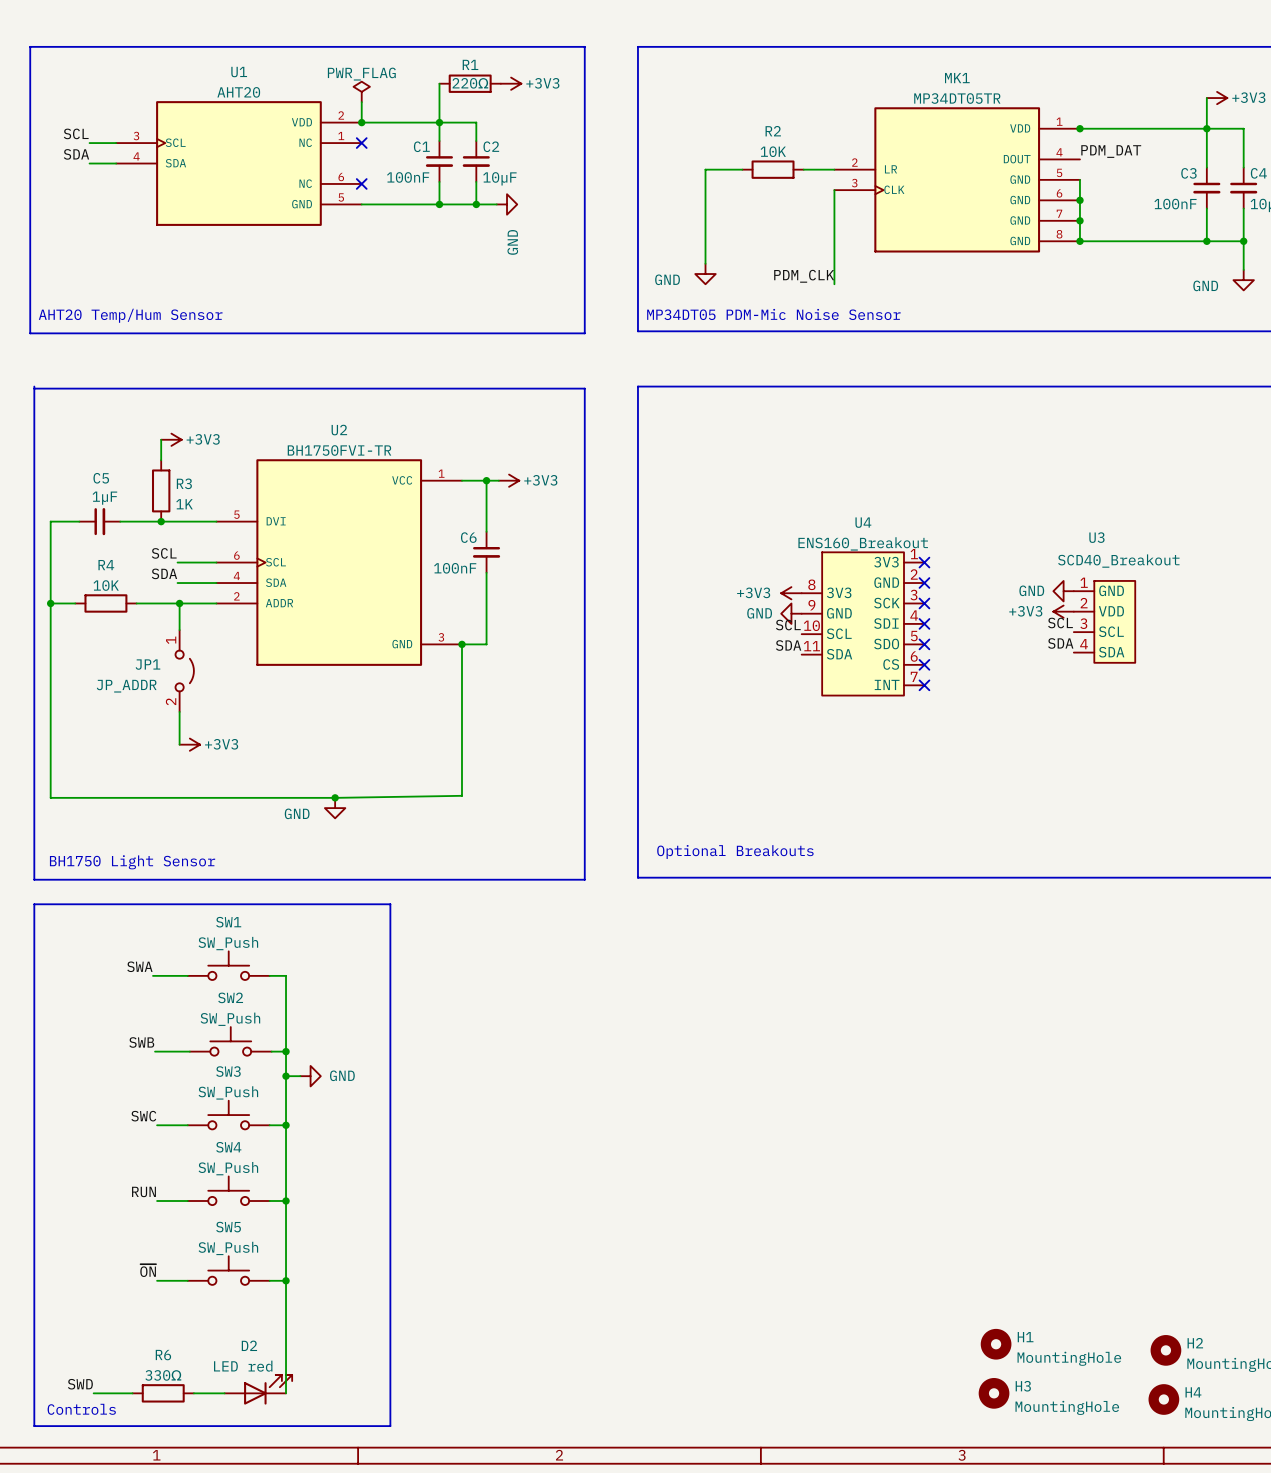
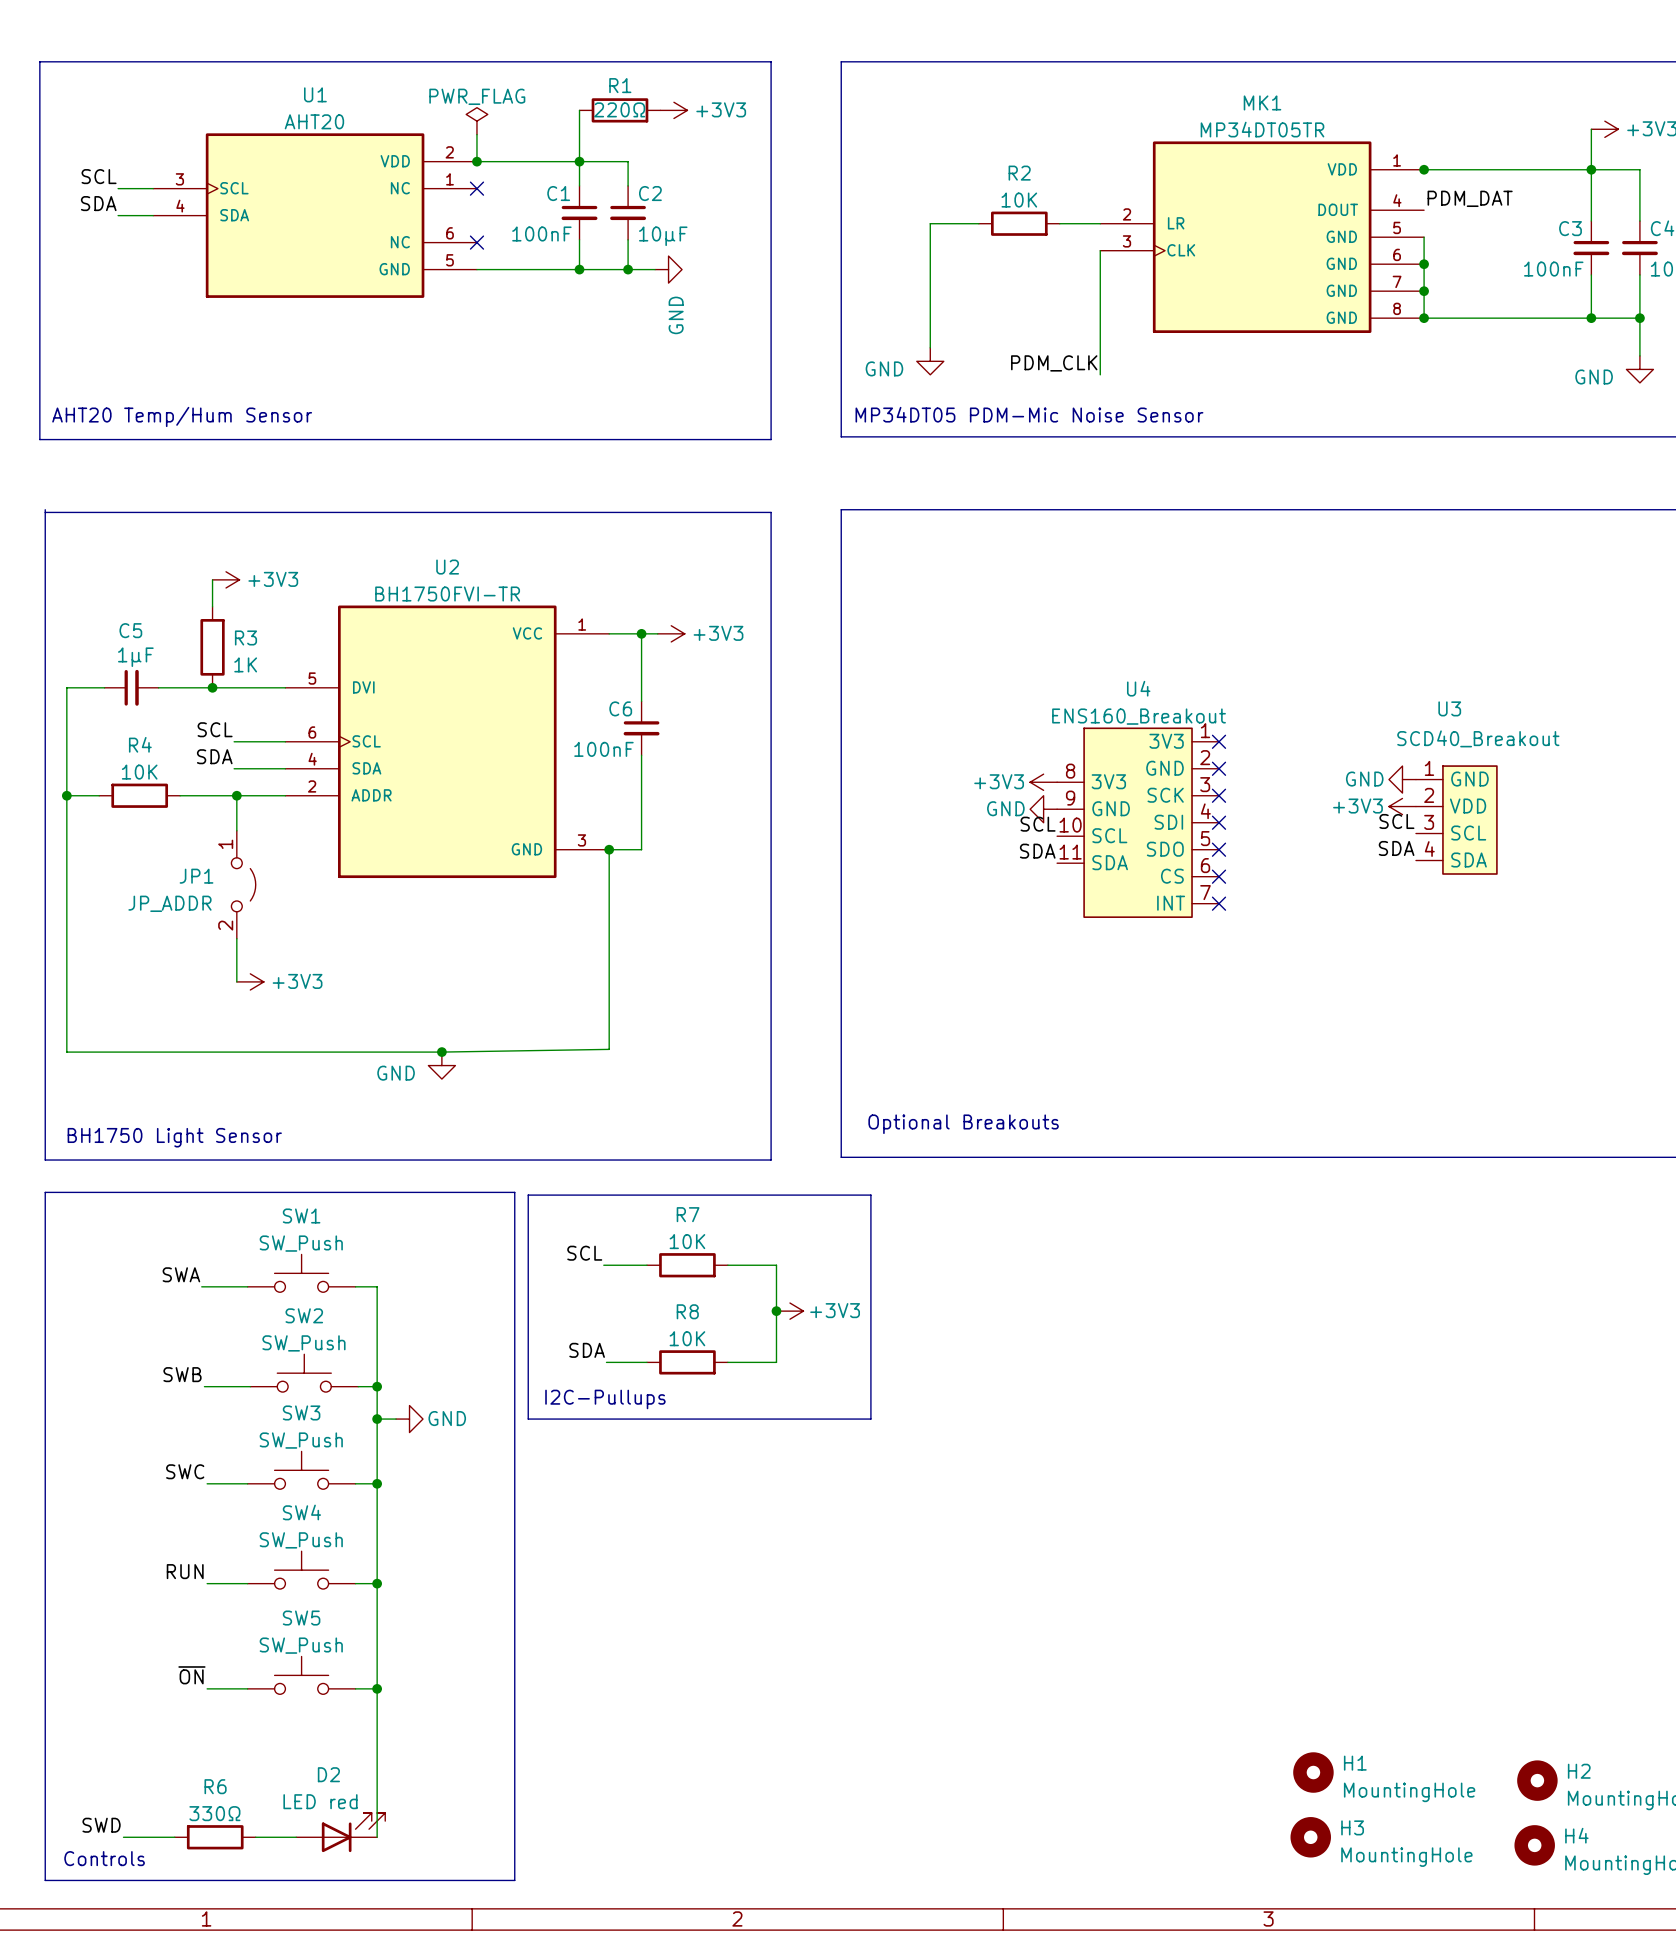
line: none -> (528, 1195) (870, 1195) (870, 1419) (528, 1419) (528, 1195)
label: none -> SCL (584, 1253)
wire: none -> (603, 1265) (646, 1265)
R7: none -> 10K (687, 1265)
wire: none -> (727, 1265) (776, 1265) (776, 1362) (727, 1362)
junction: none -> (776, 1311)
power symbol: none -> +3V3 (789, 1311)
label: none -> SDA (587, 1350)
wire: none -> (606, 1362) (646, 1362)
R8: none -> 10K (687, 1362)
text: none -> I2C-Pullups (605, 1399)

